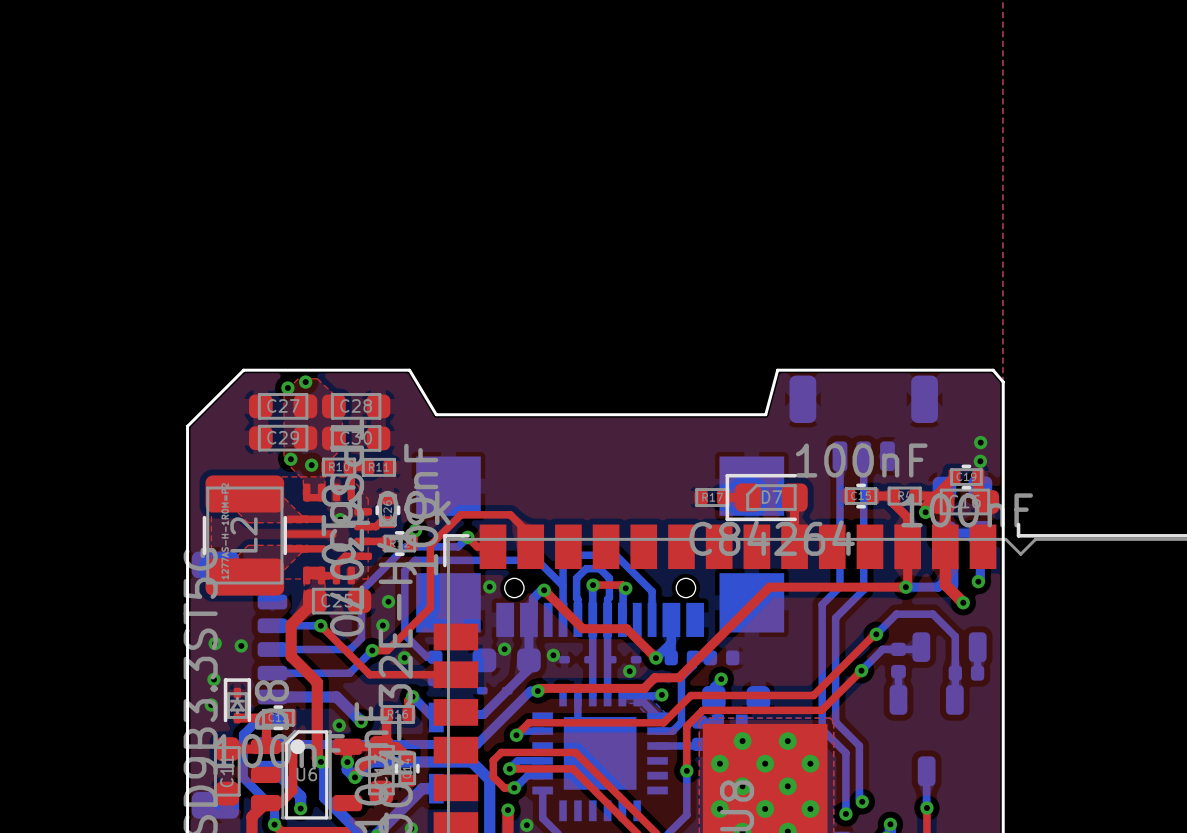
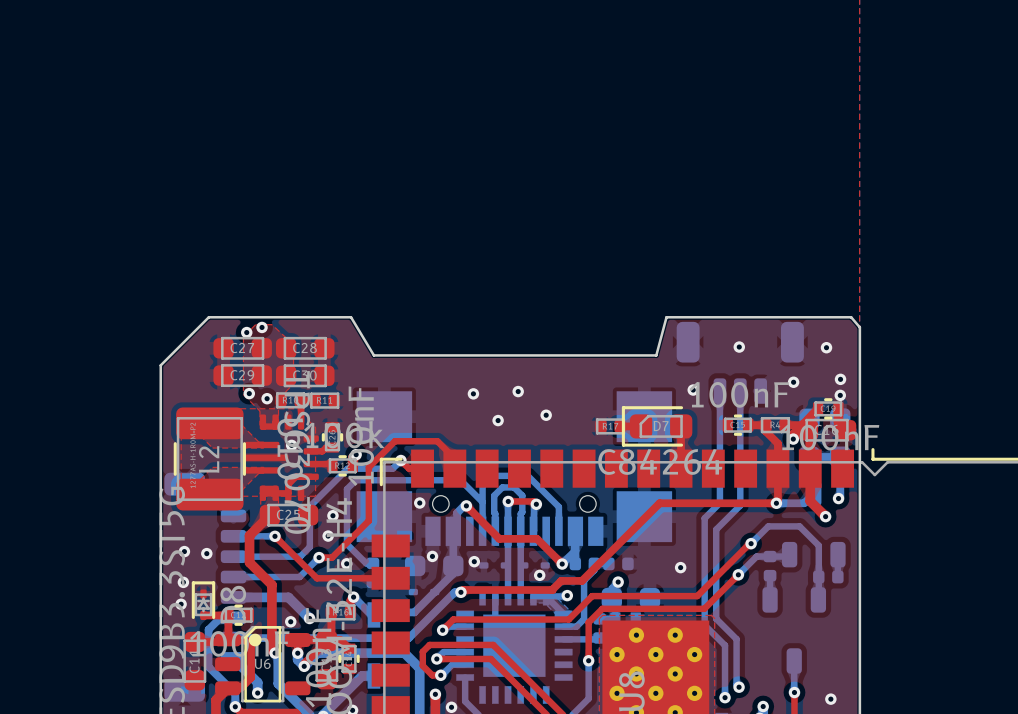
via: none -> (739, 347)
via: none -> (826, 347)
via: none -> (793, 382)
via: none -> (693, 390)
via: none -> (518, 391)
via: none -> (473, 393)
via: none -> (546, 415)
via: none -> (498, 420)
via: none -> (680, 567)
via: none -> (830, 699)

